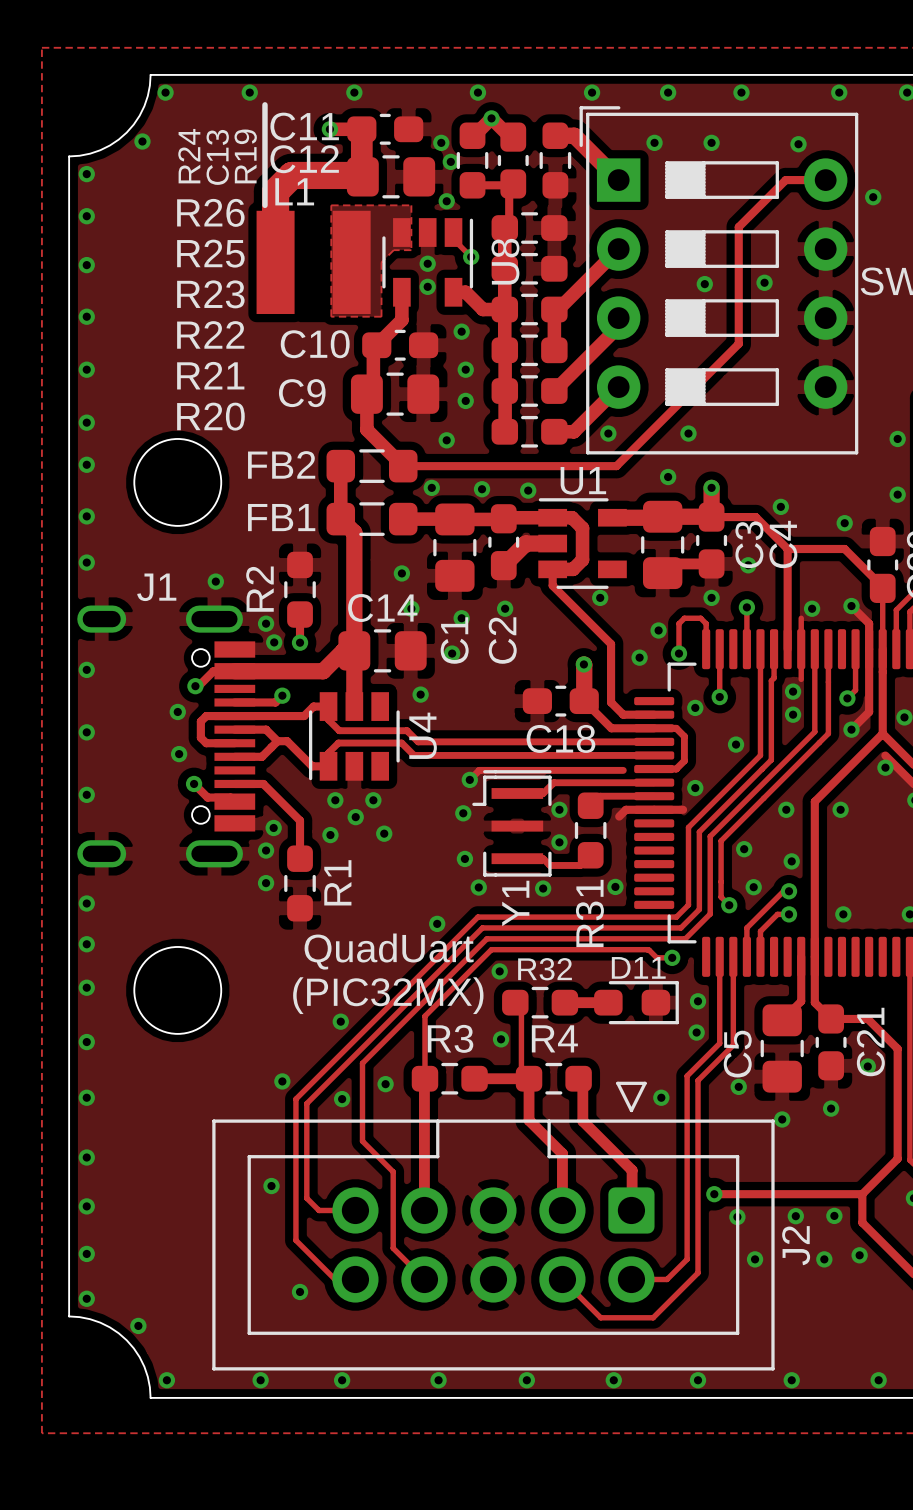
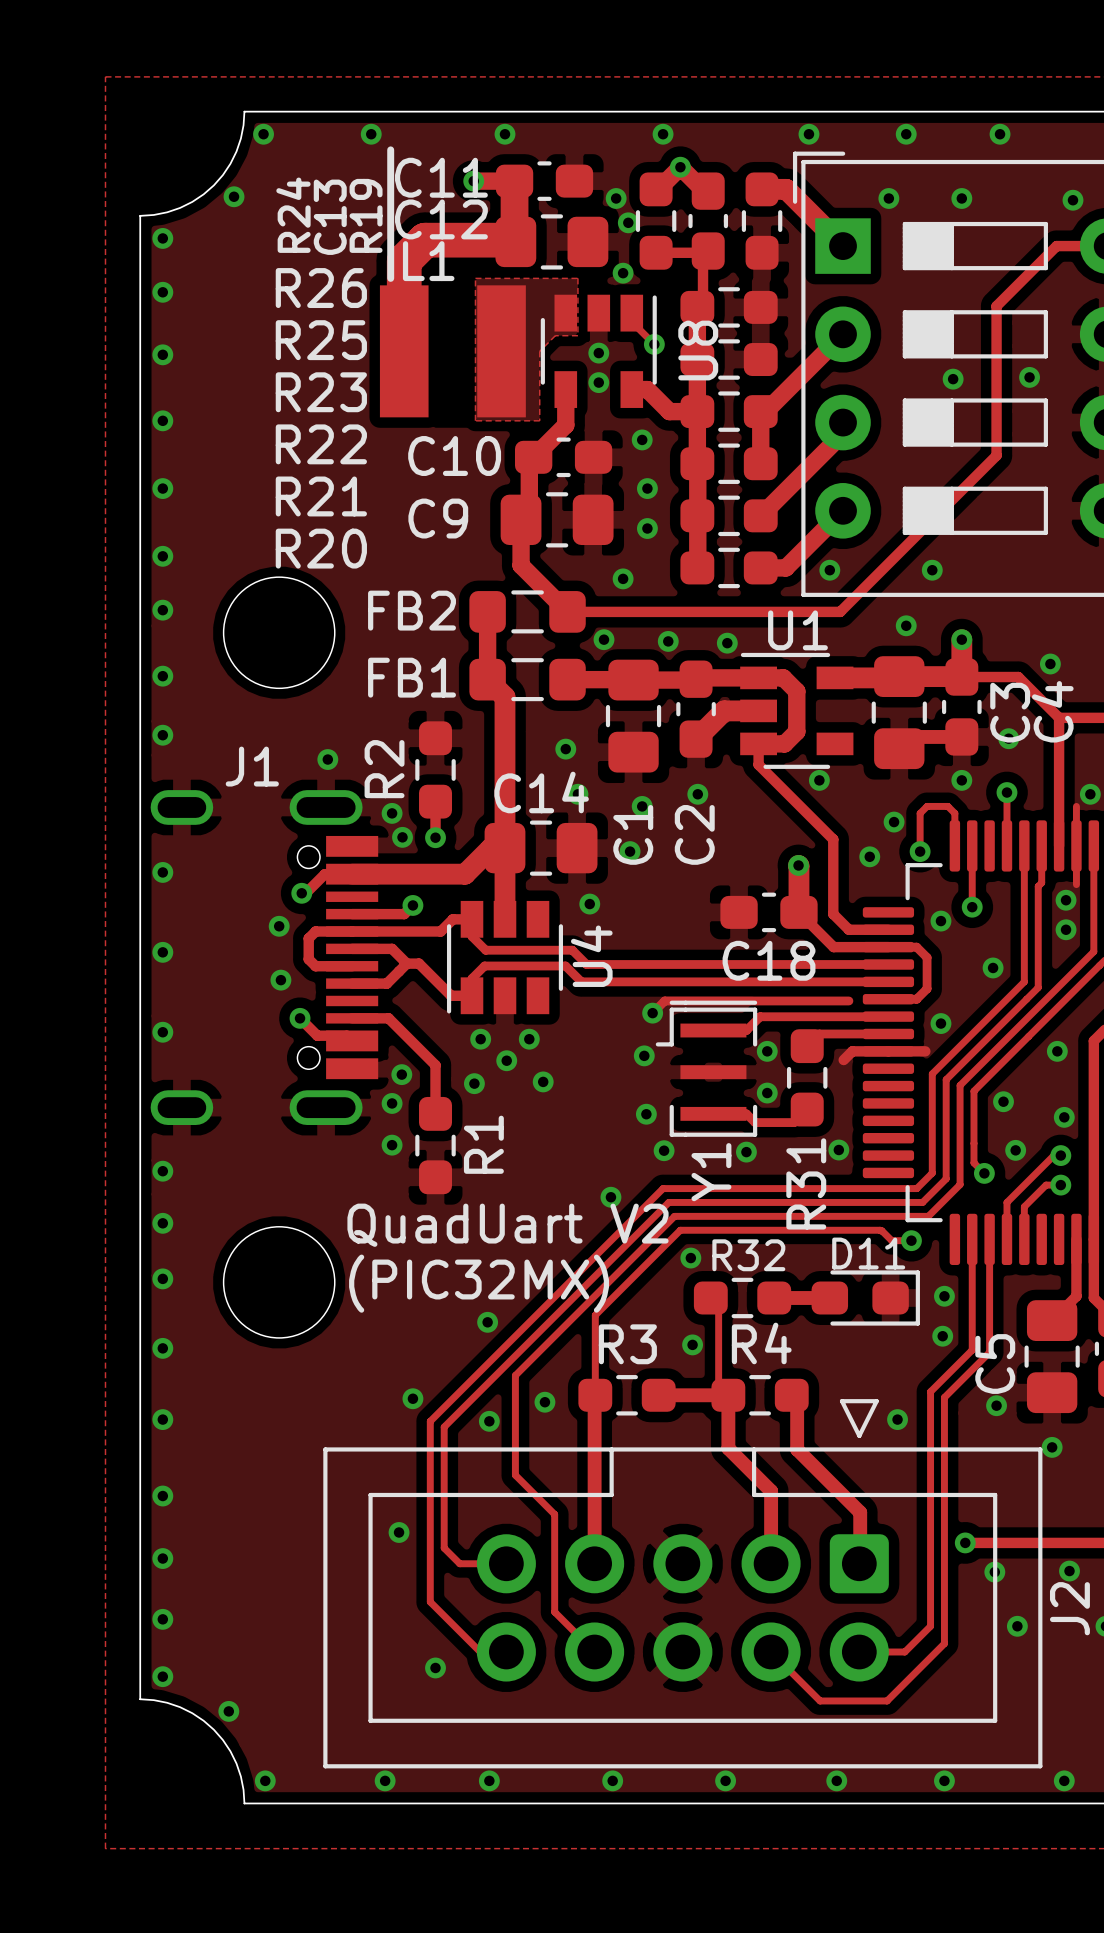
text: QuadUart (389, 951) -> QuadUart V2 (508, 1225)
text position: (PIC32MX) (388, 995) -> (PIC32MX) (479, 1283)

